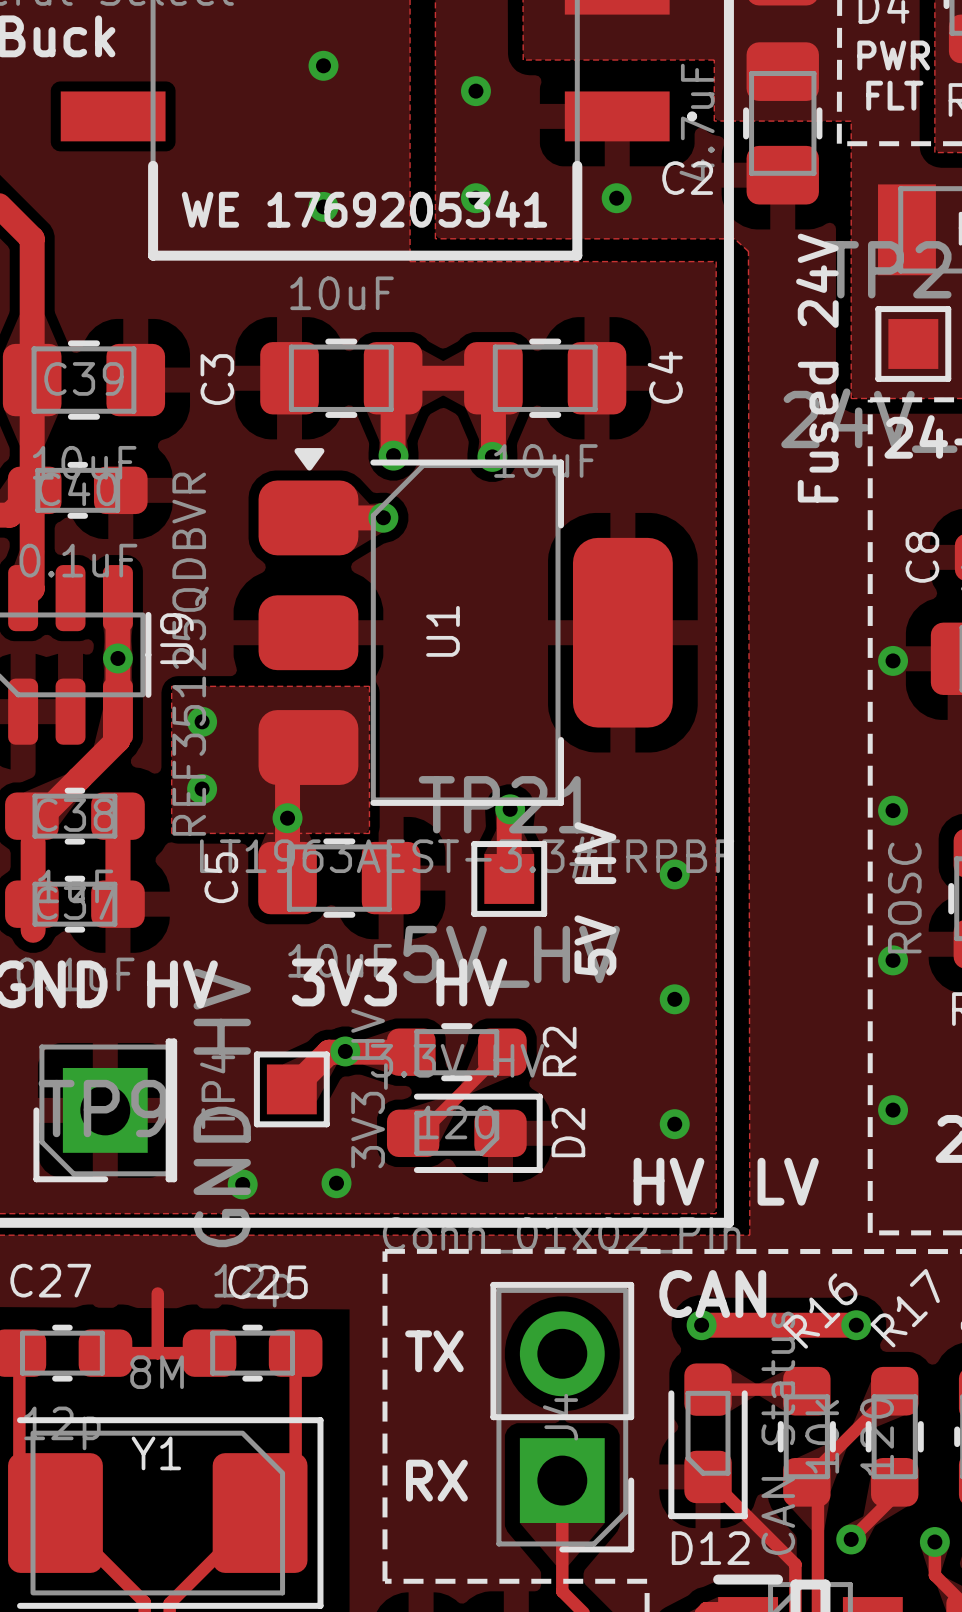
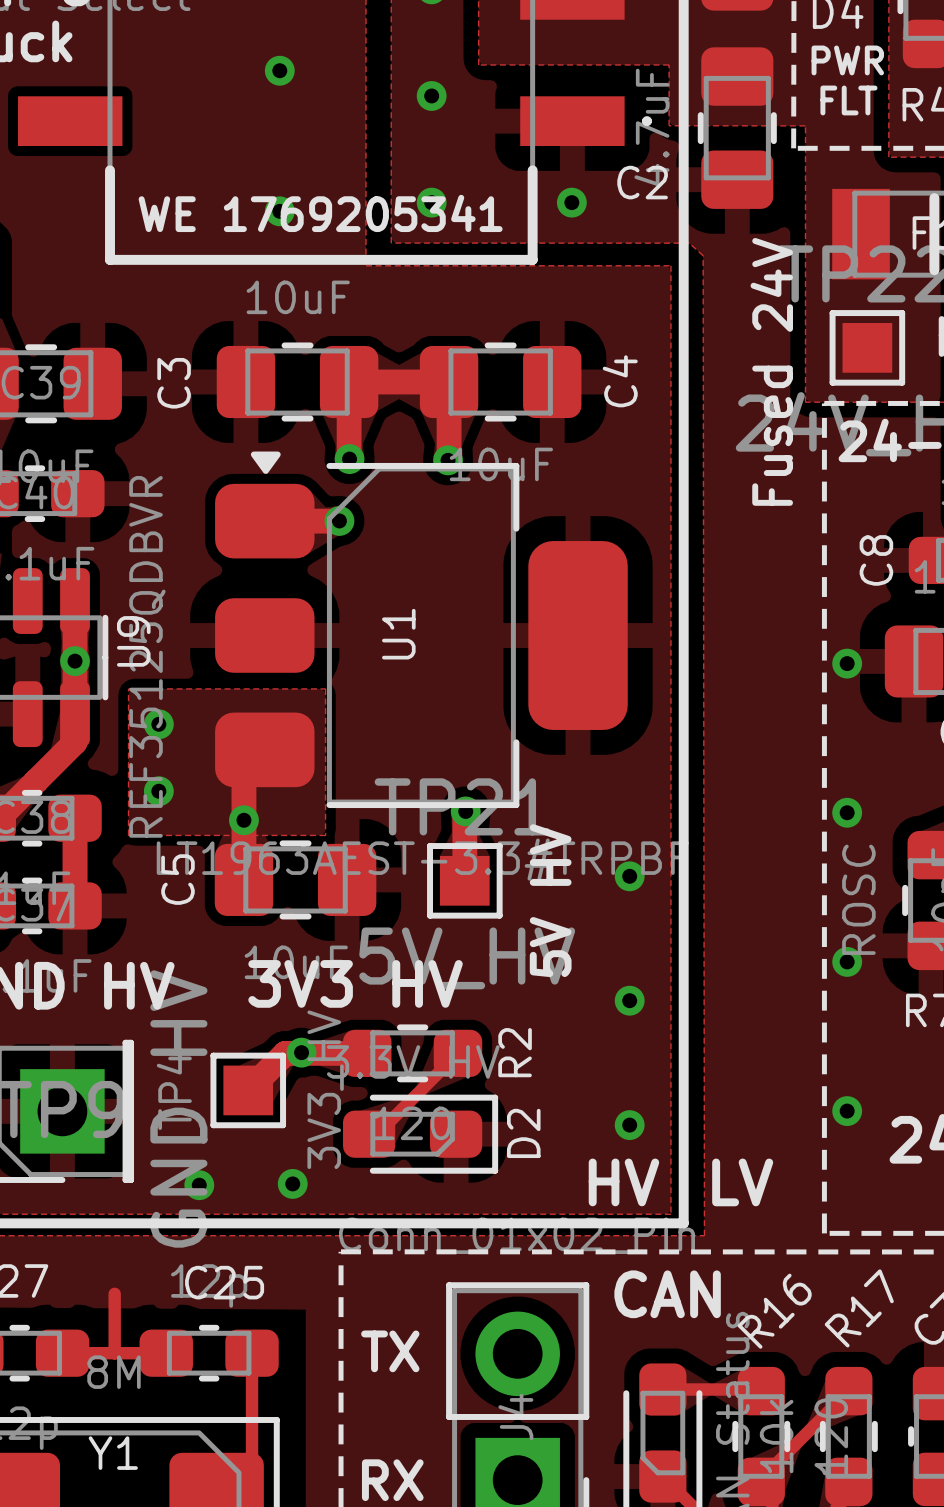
track: (701, 1325) (856, 1325) -> none
via: (701, 1325) -> none
via: (856, 1325) -> none

